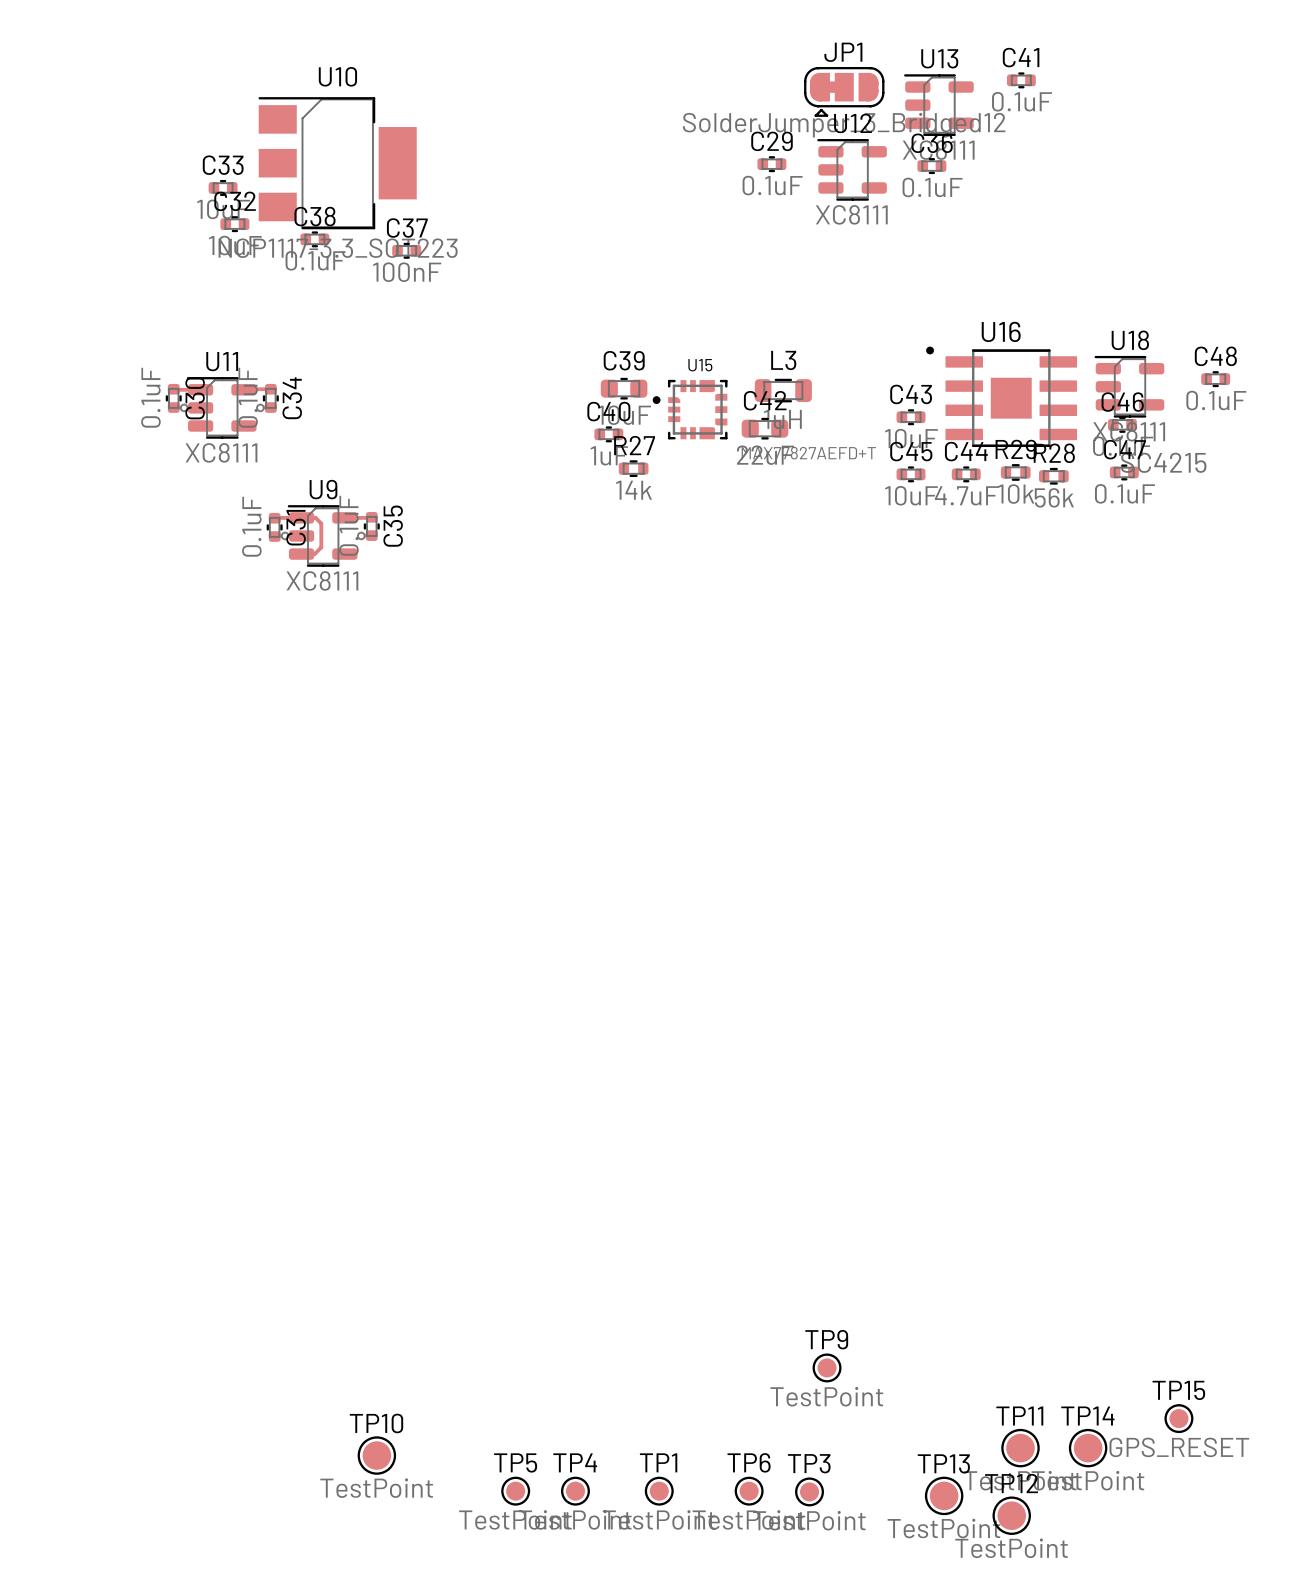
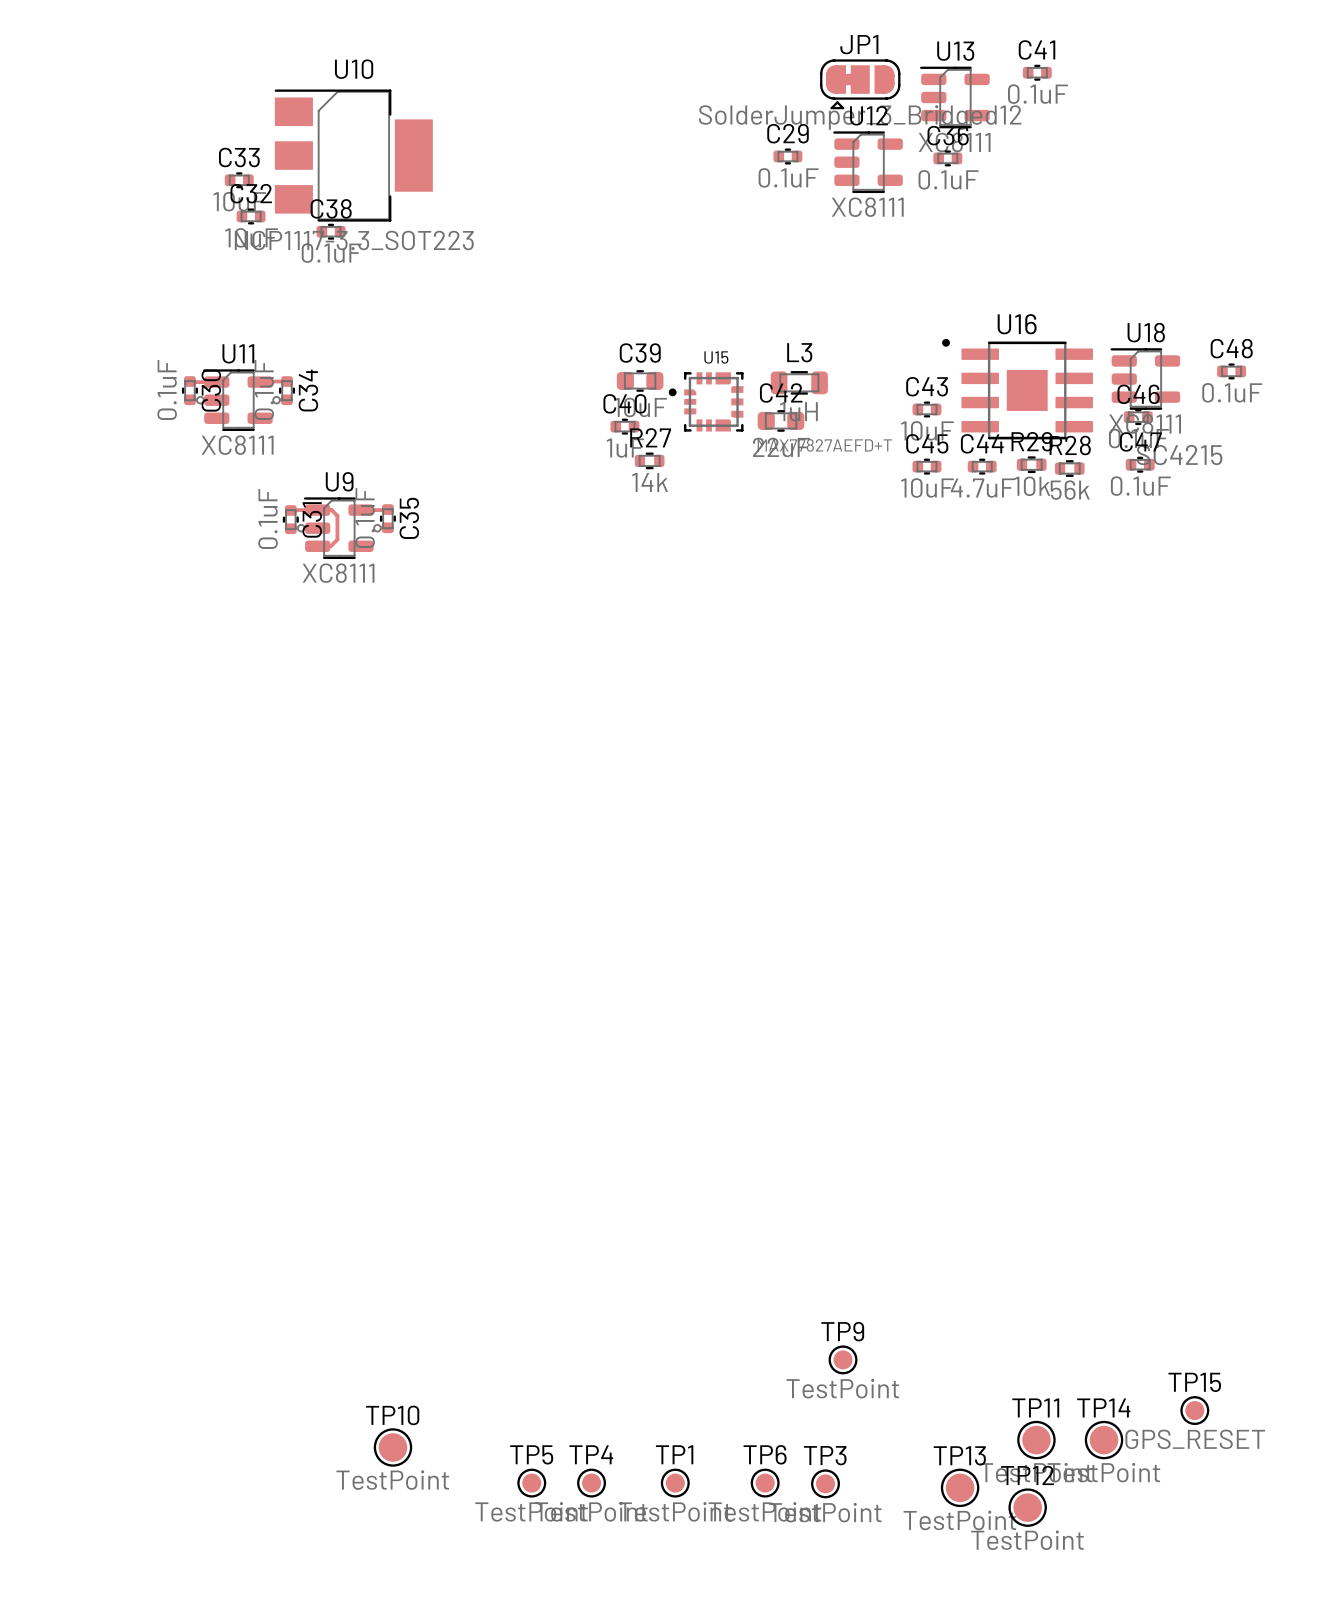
C37: 100nF (406, 250) -> none

